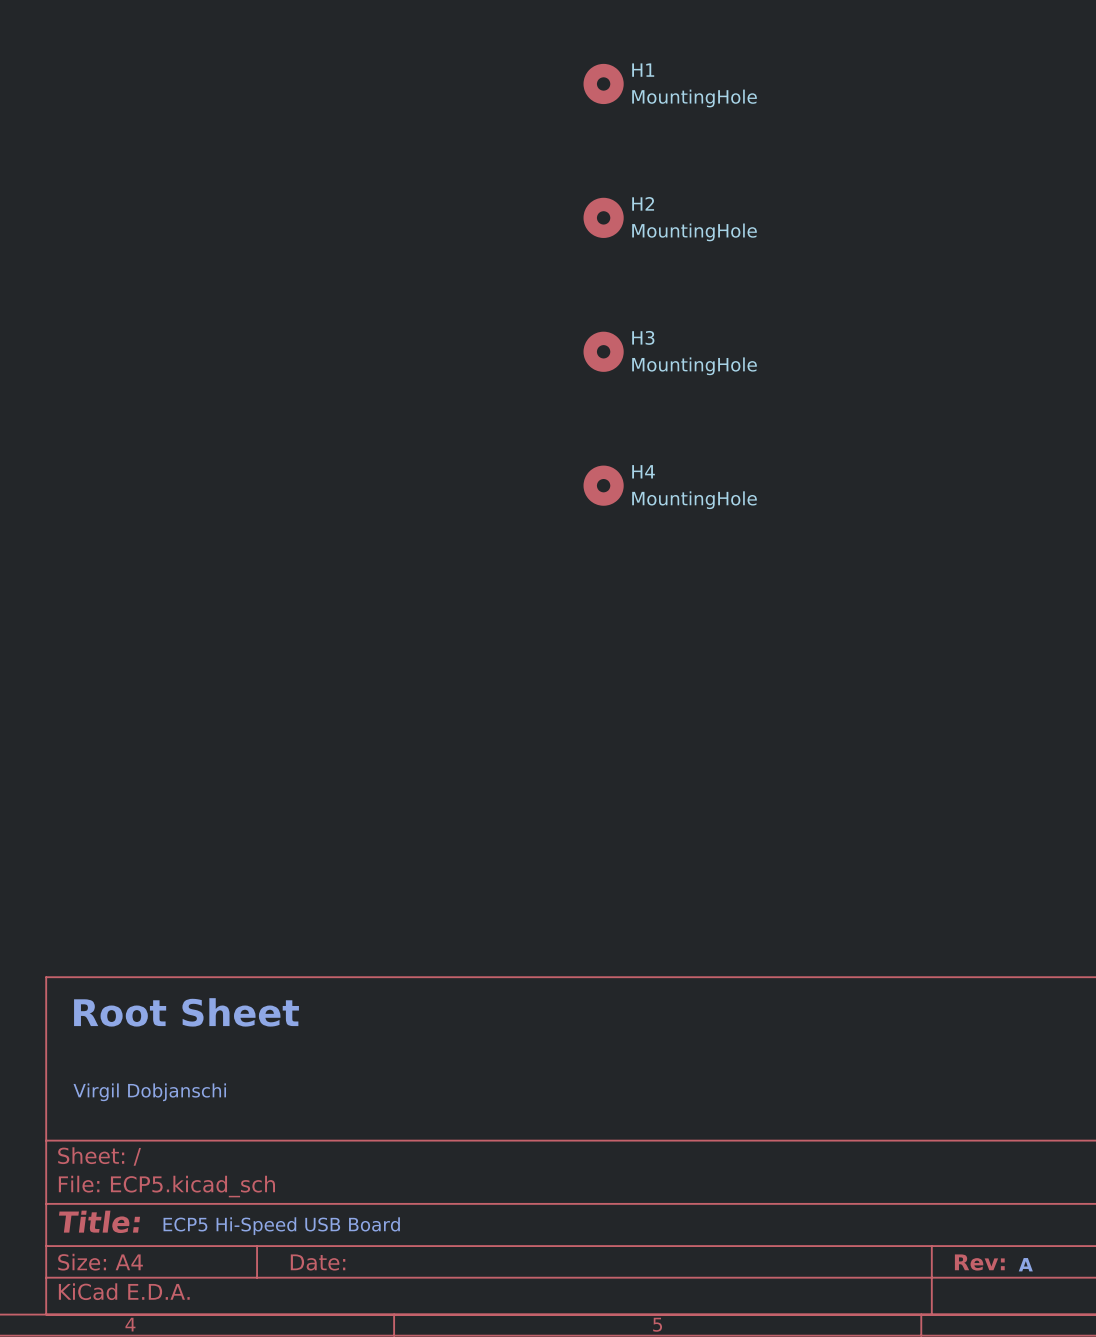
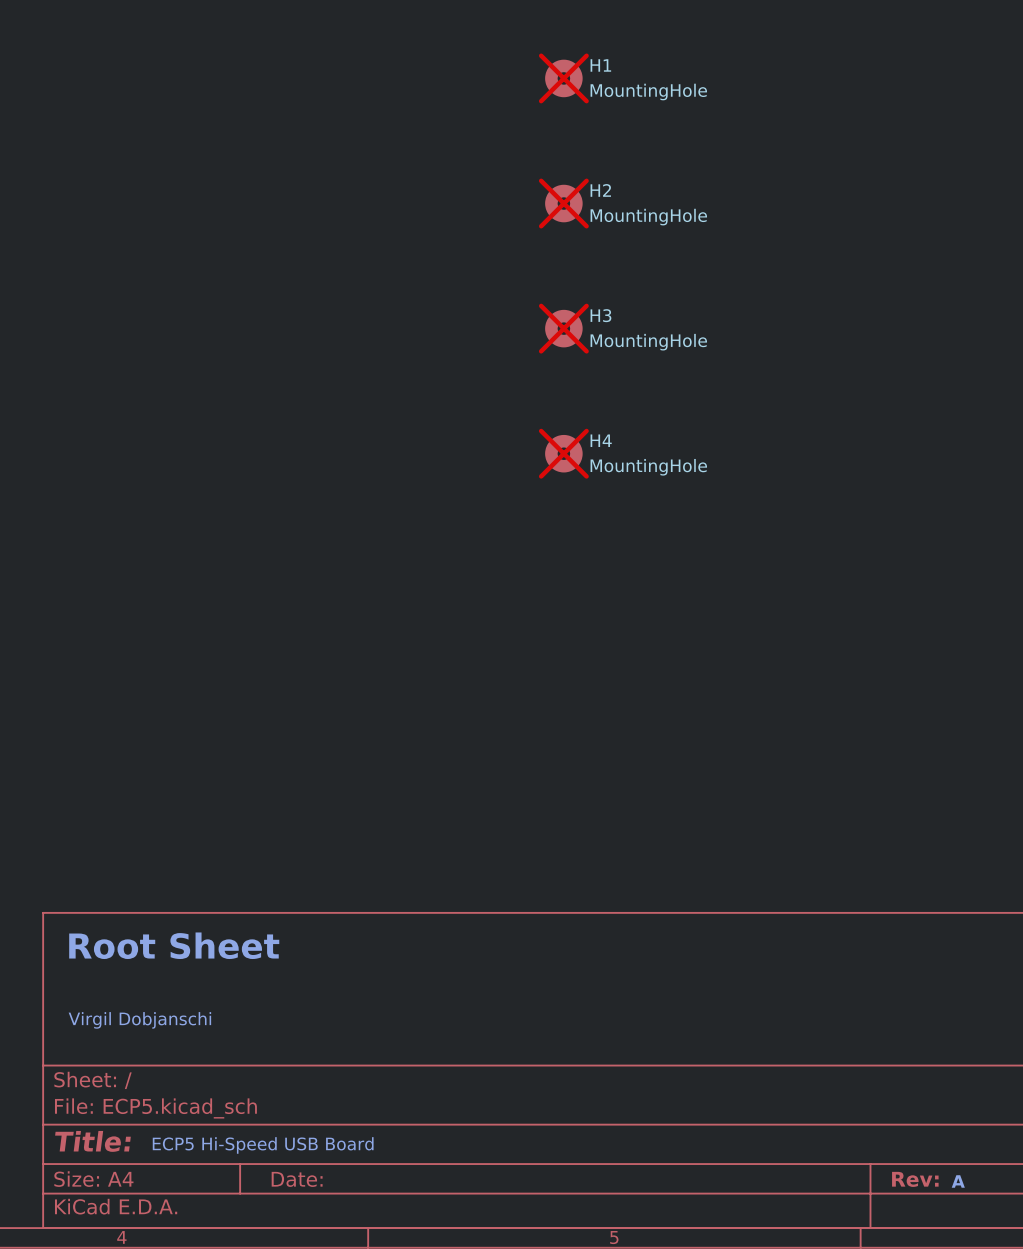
H1 do-not-place cross: none -> (563, 78)
H2 do-not-place cross: none -> (563, 203)
H3 do-not-place cross: none -> (563, 328)
H4 do-not-place cross: none -> (563, 453)

